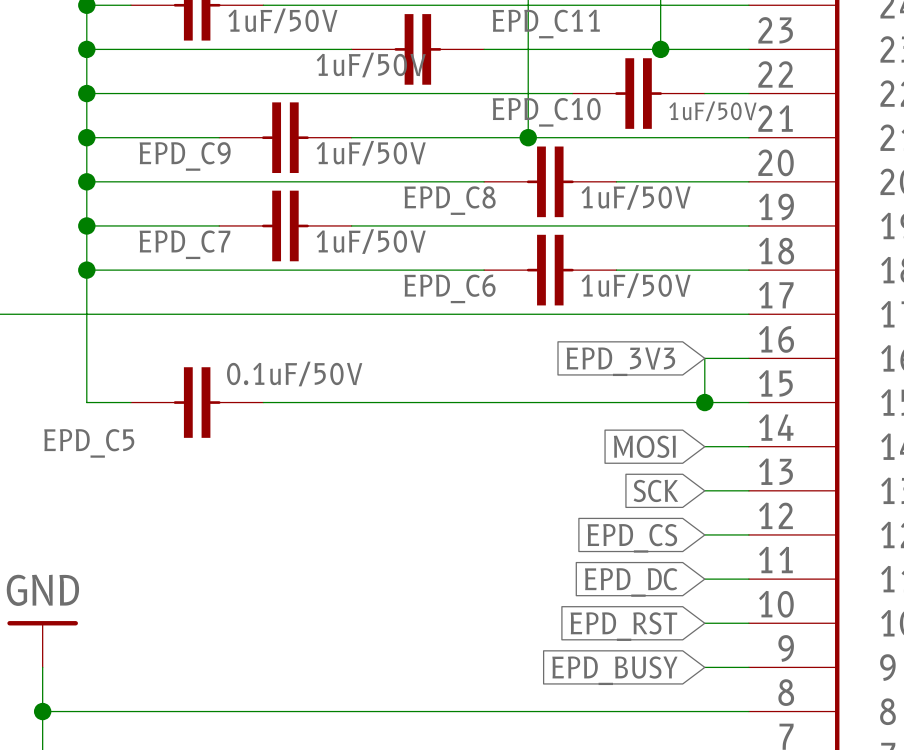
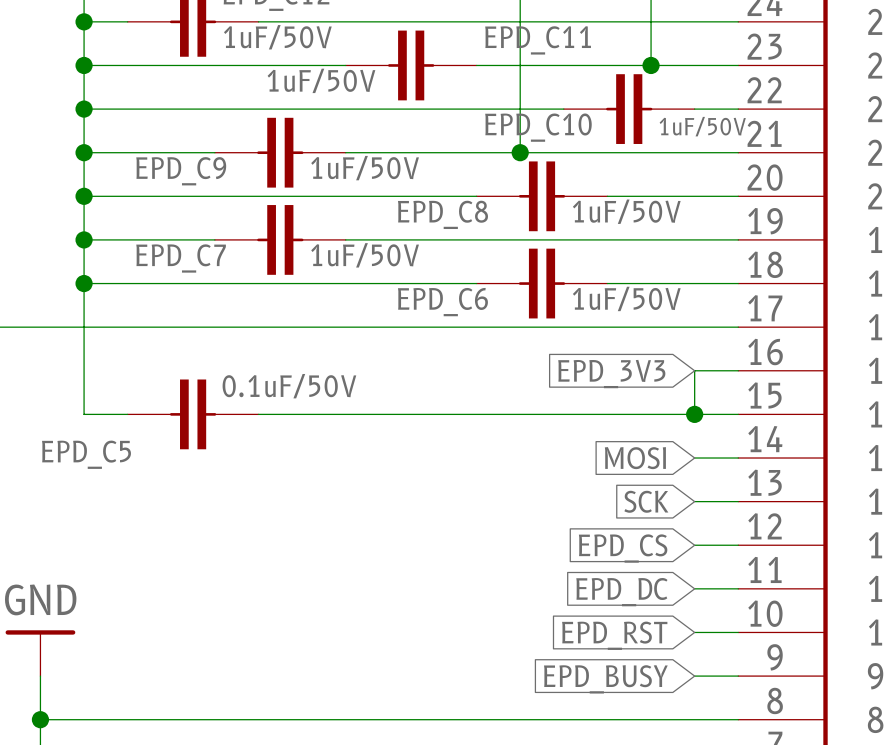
EPD_C11 value position: 1uF/50V (371, 64) -> 1uF/50V (321, 80)

